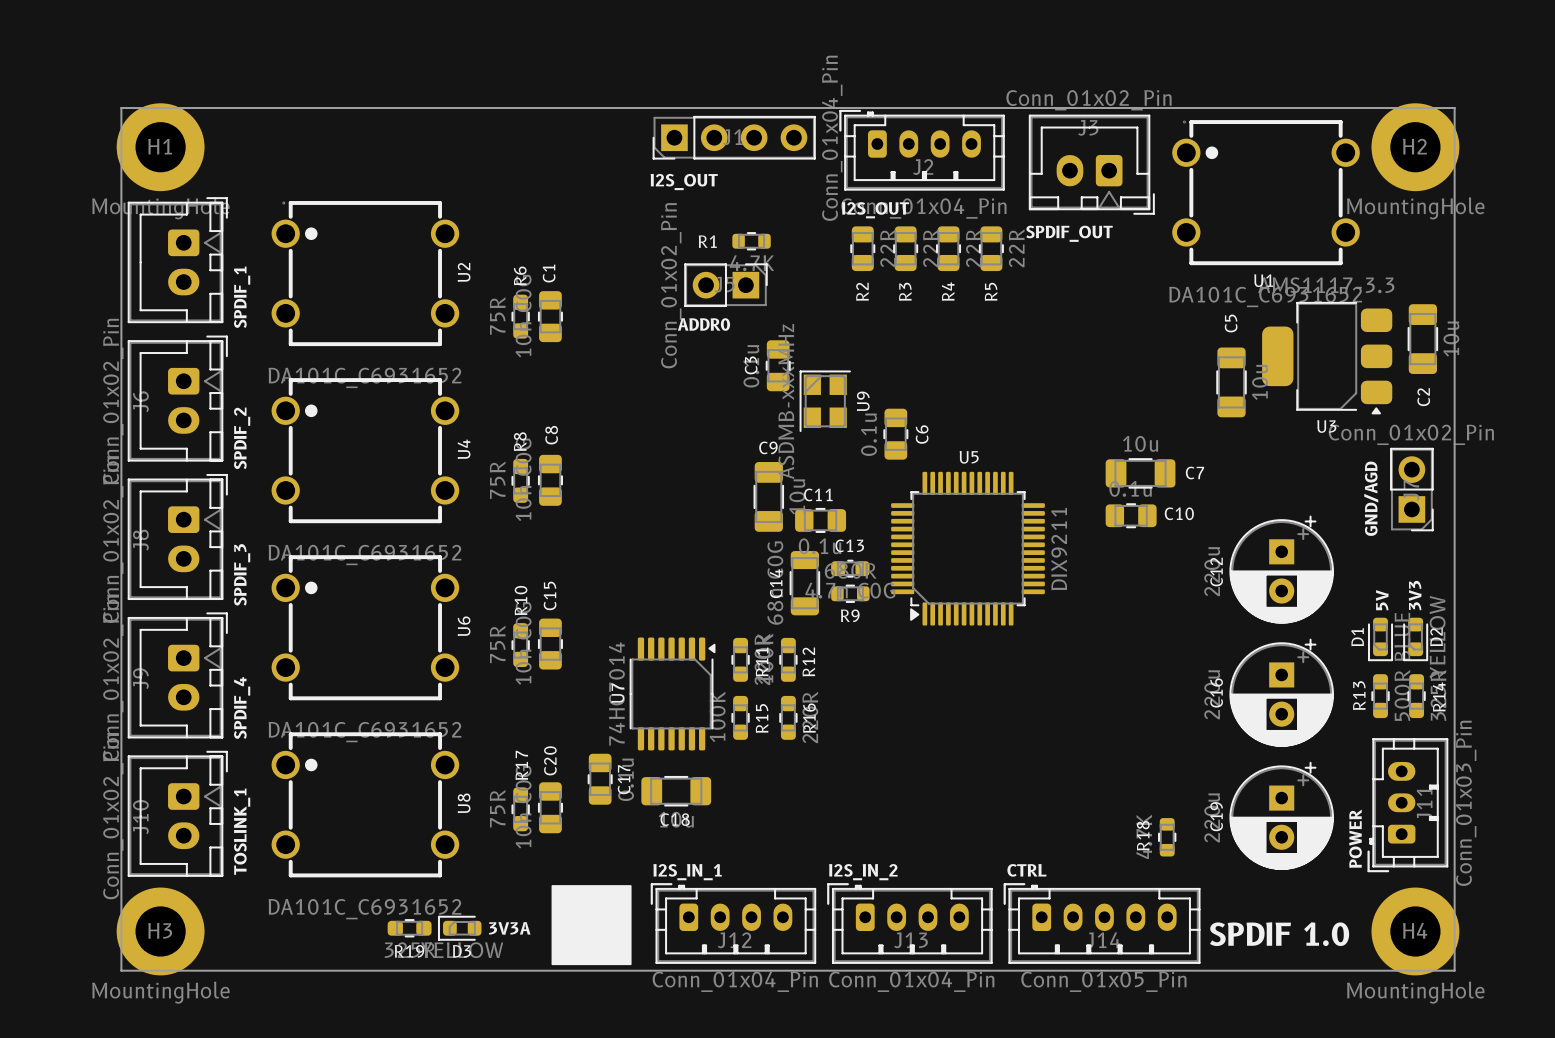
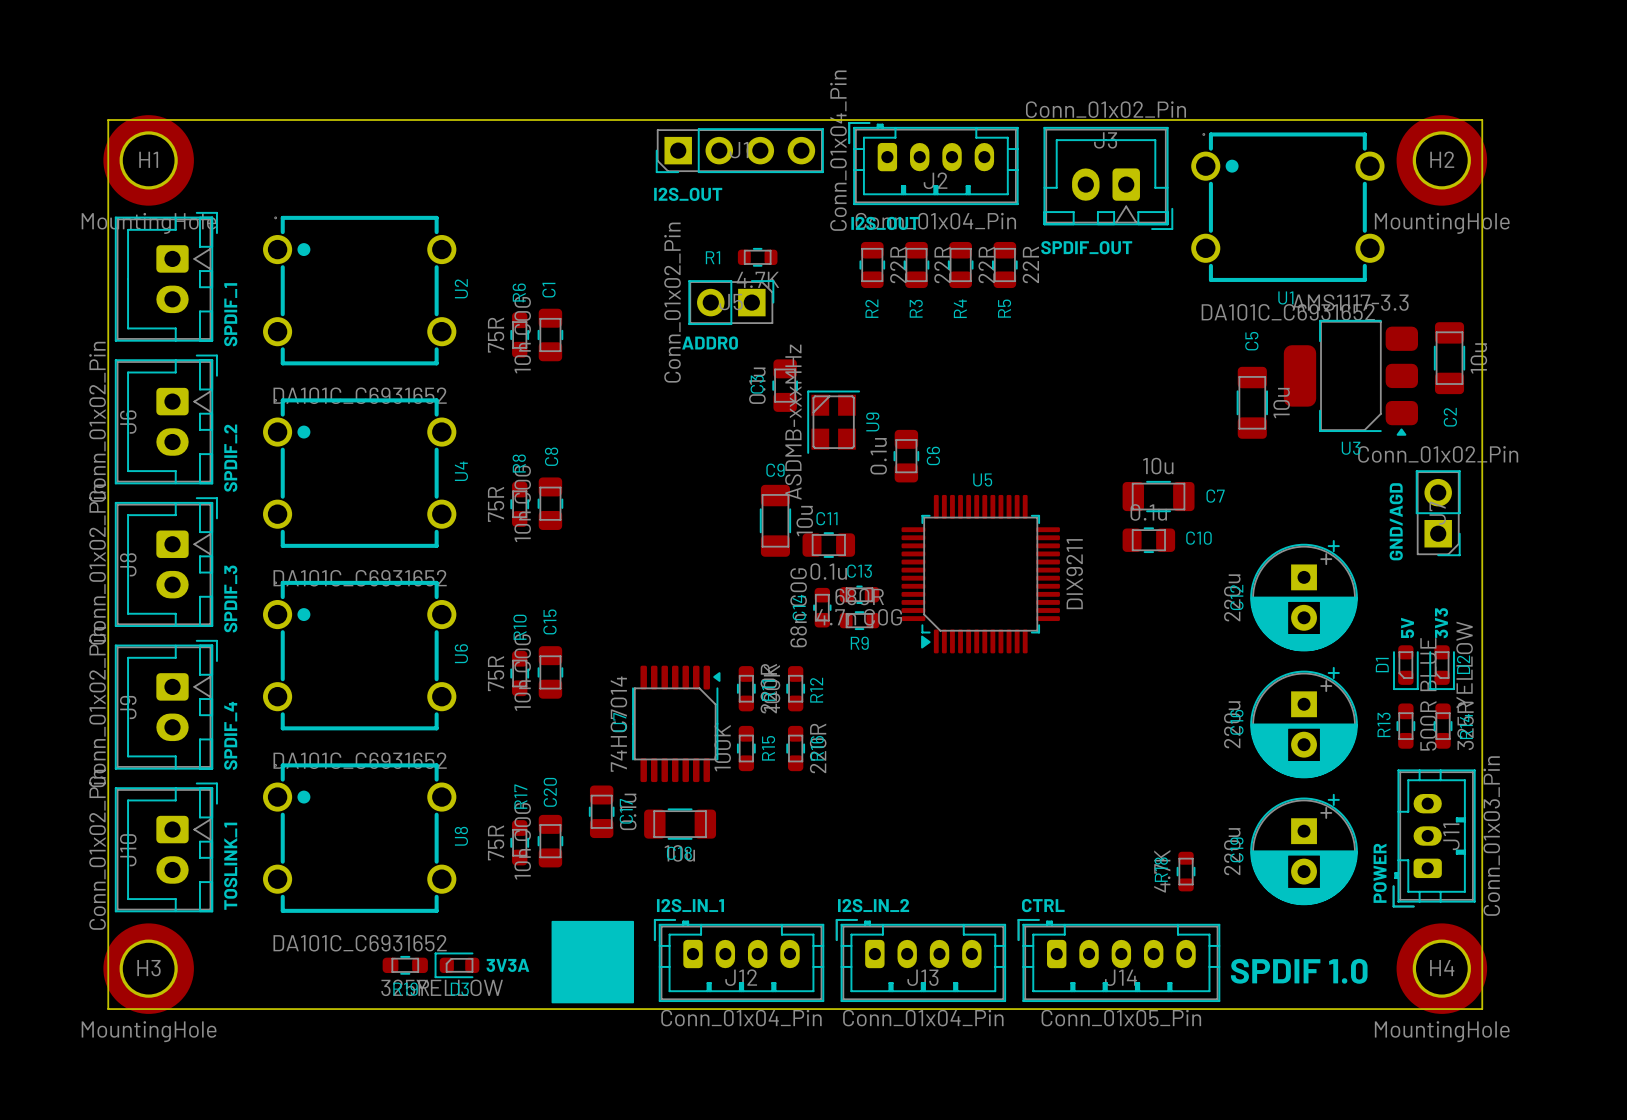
C14 footprint: [789, 551, 821, 616] -> [813, 587, 832, 628]

